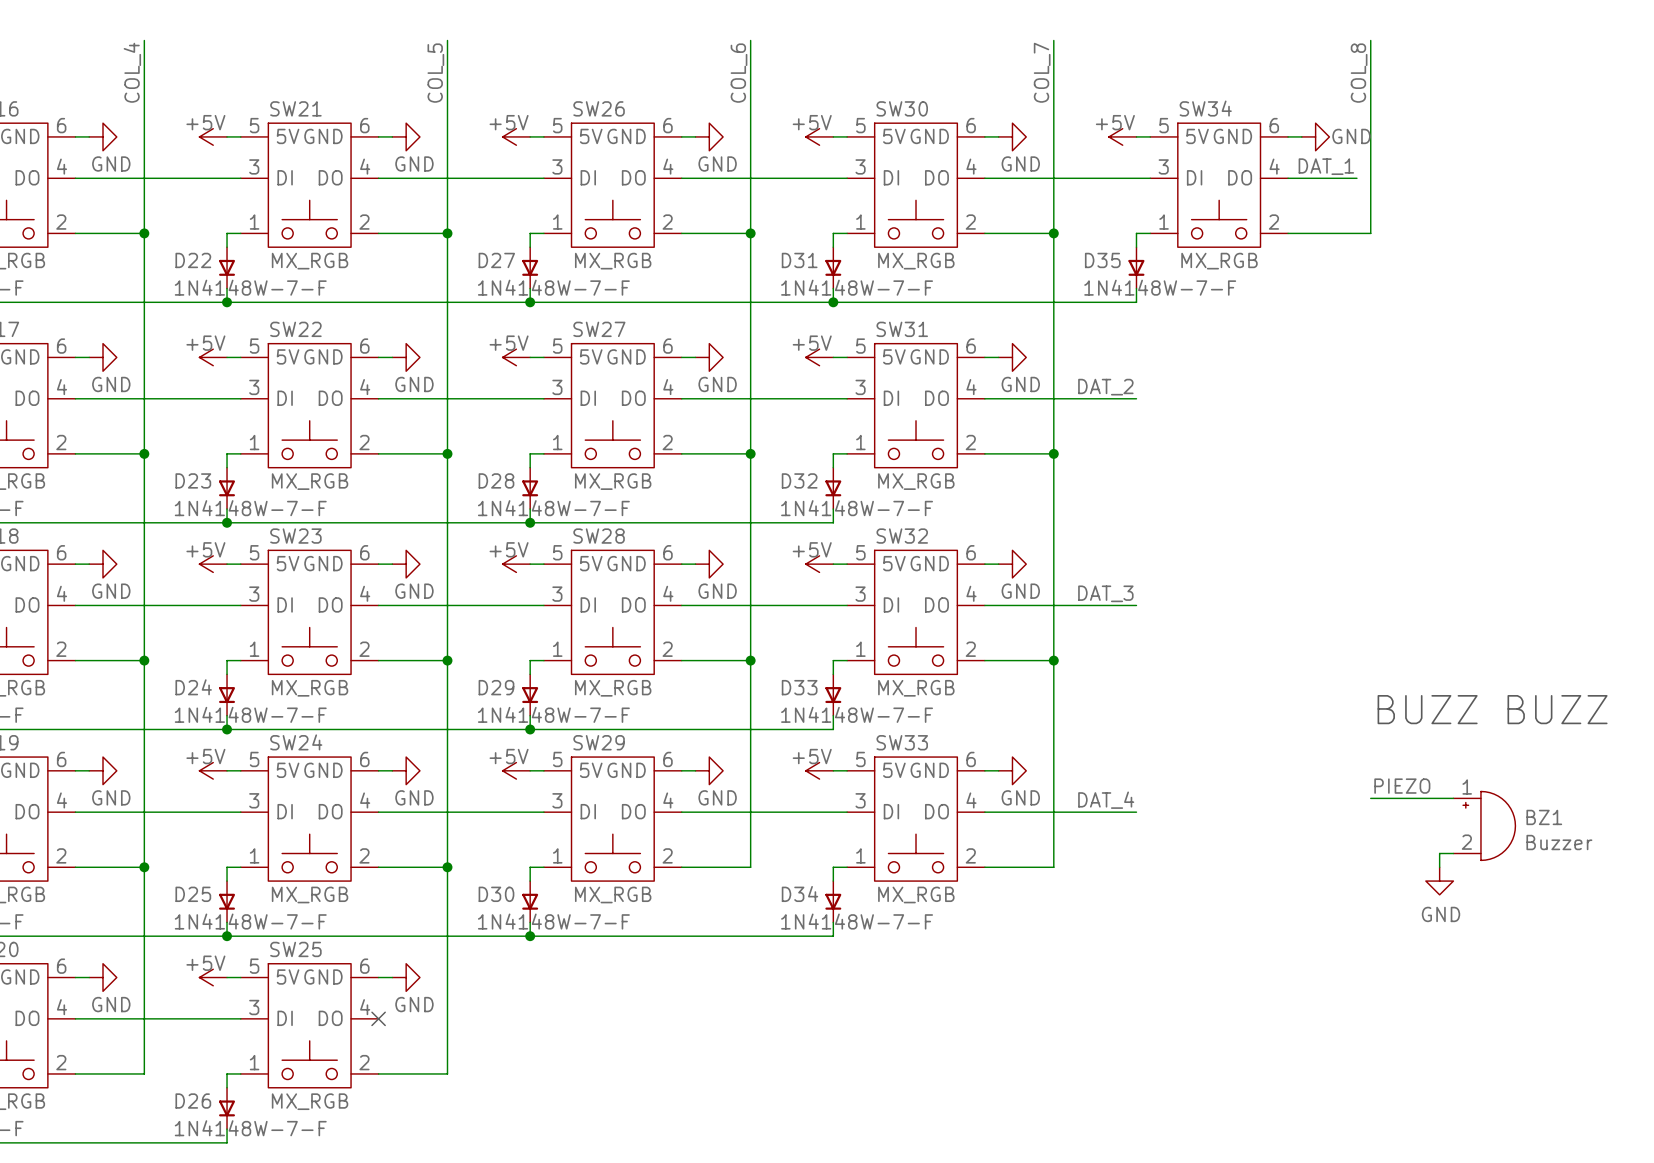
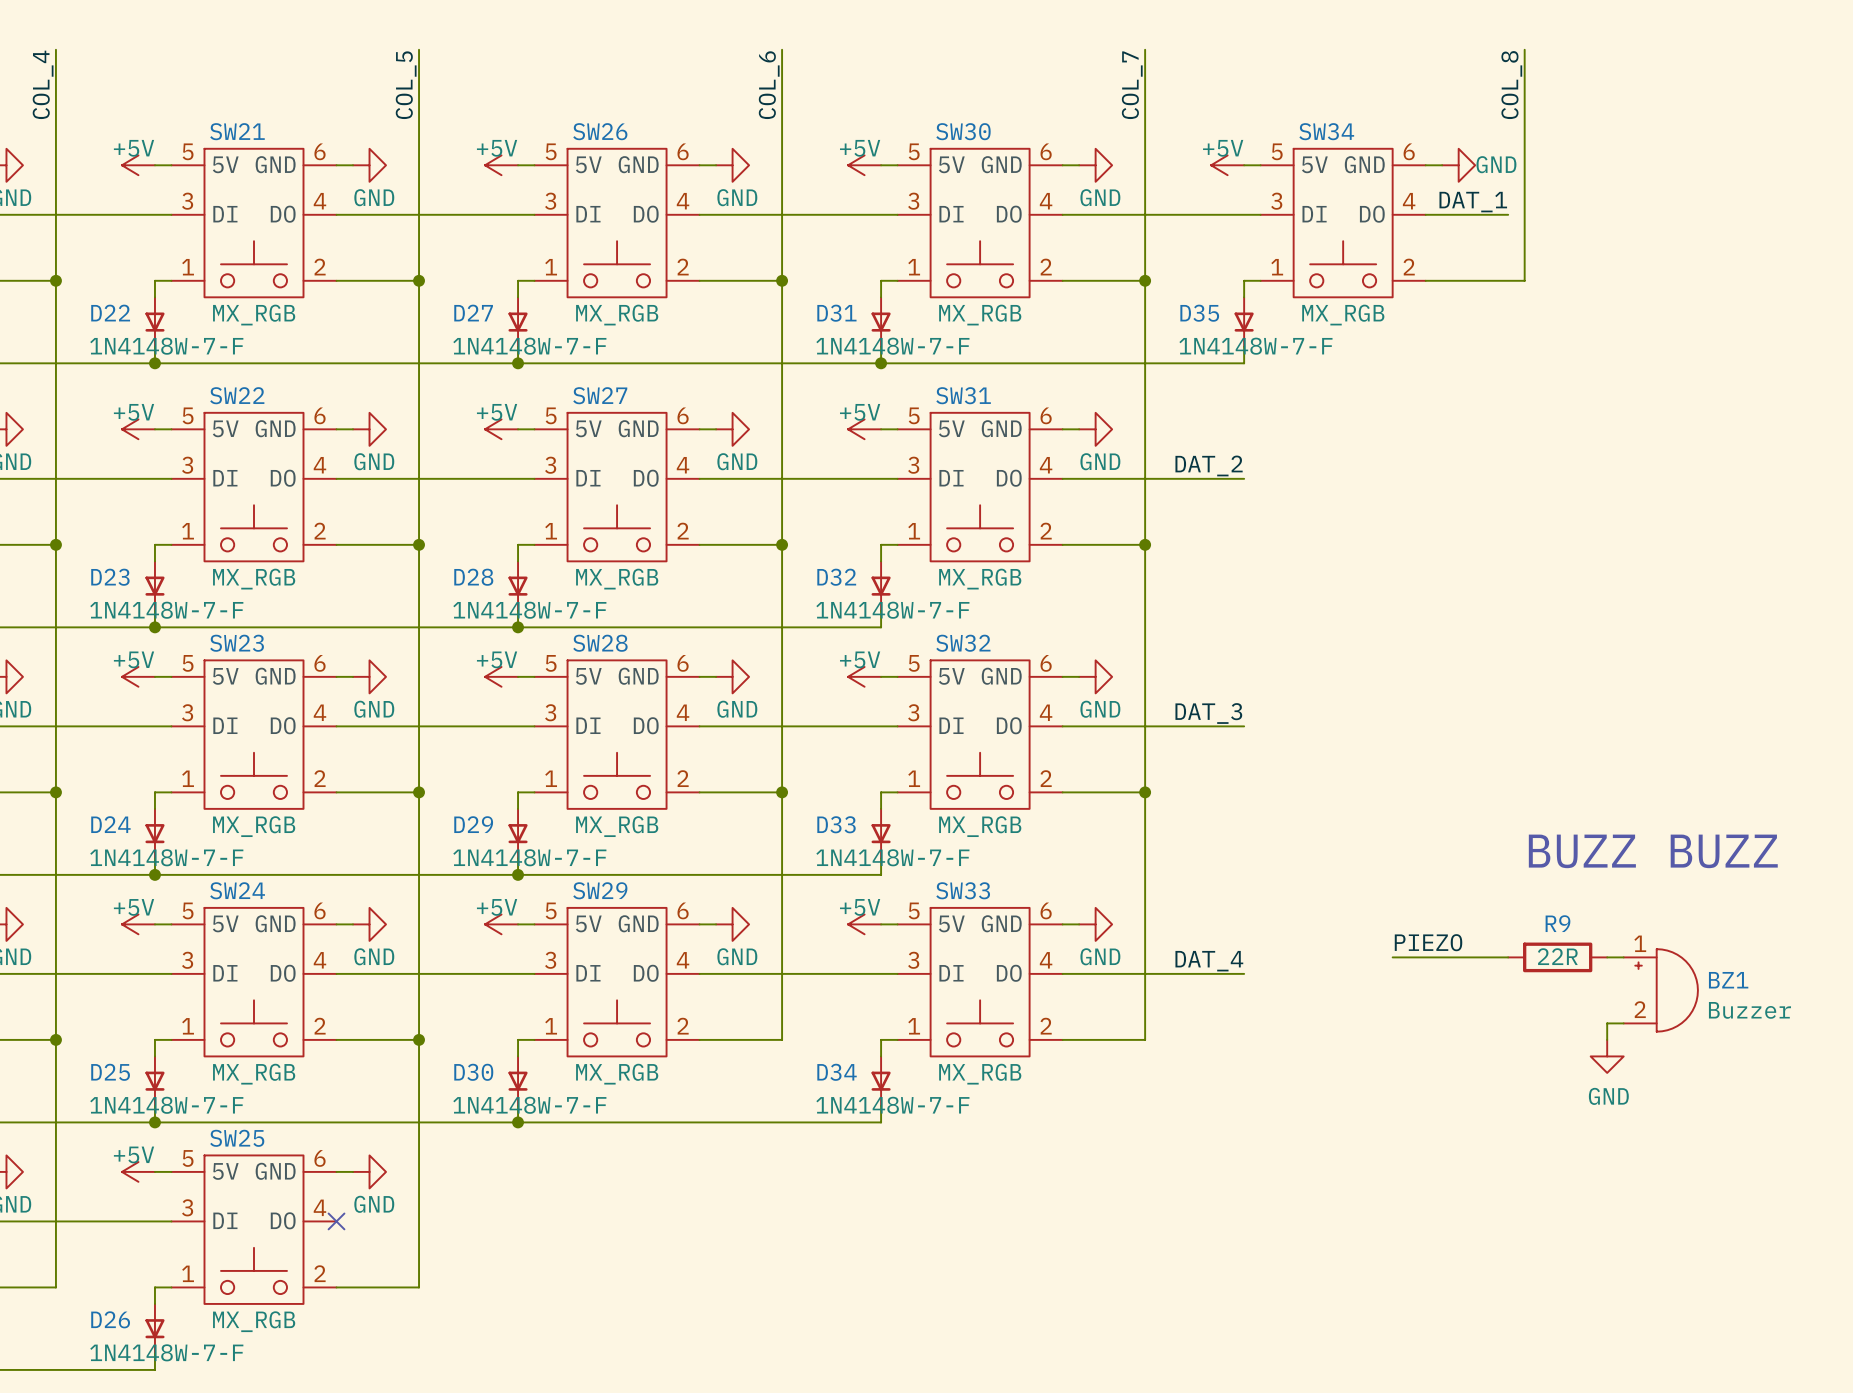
label position: PIEZO (1402, 786) -> PIEZO (1428, 942)
wire: none -> (1392, 957) (1508, 957)
wire: (1370, 798) (1439, 798) -> none
R9: none -> 22R (1557, 957)

